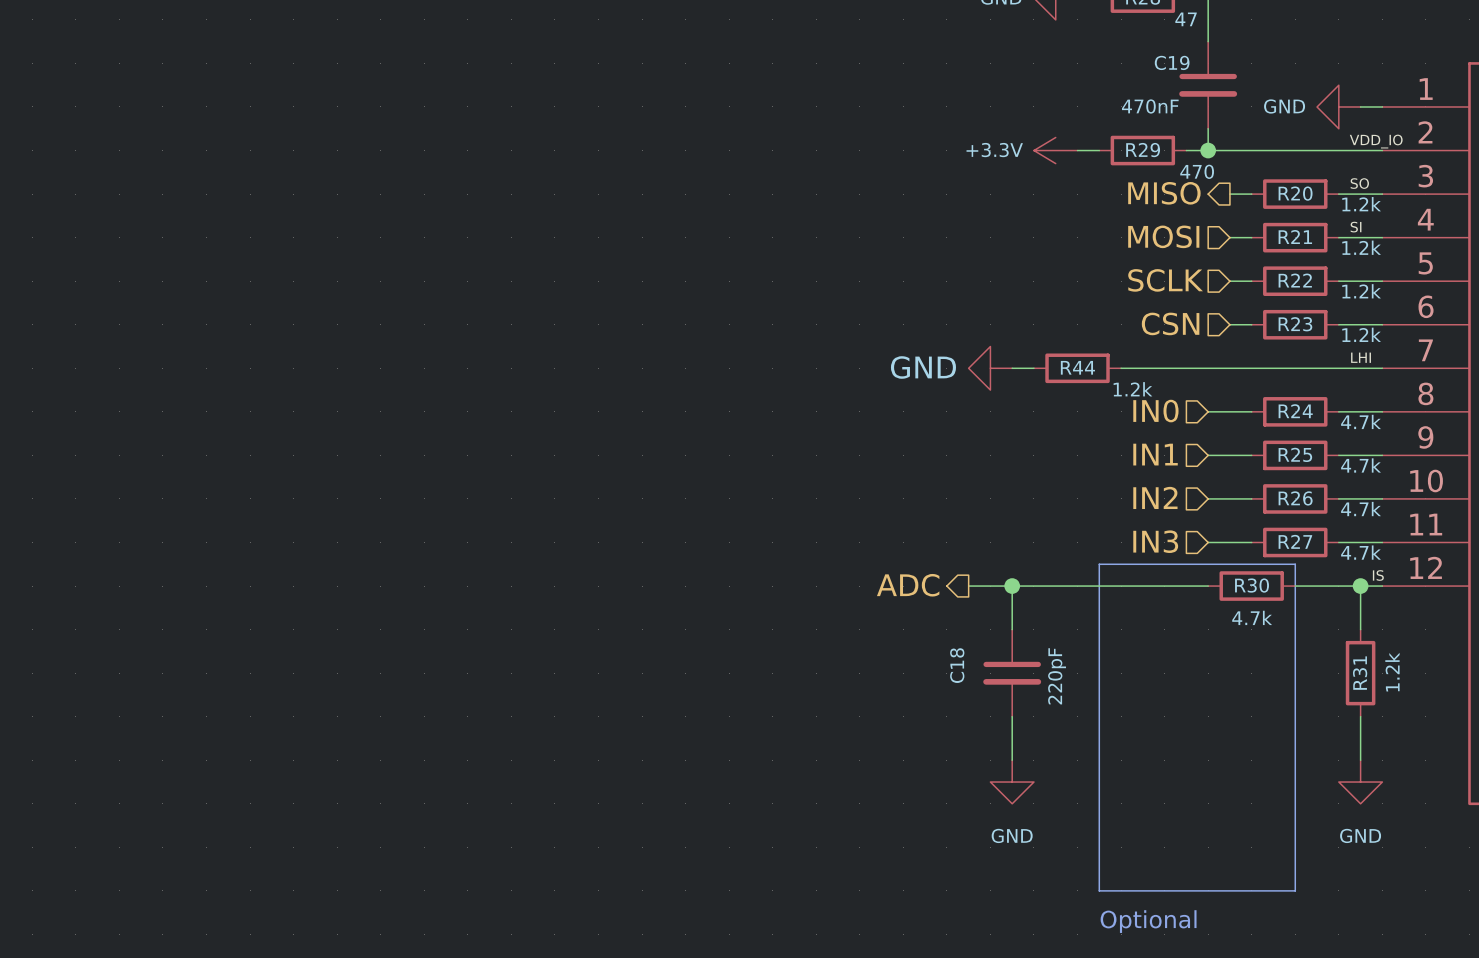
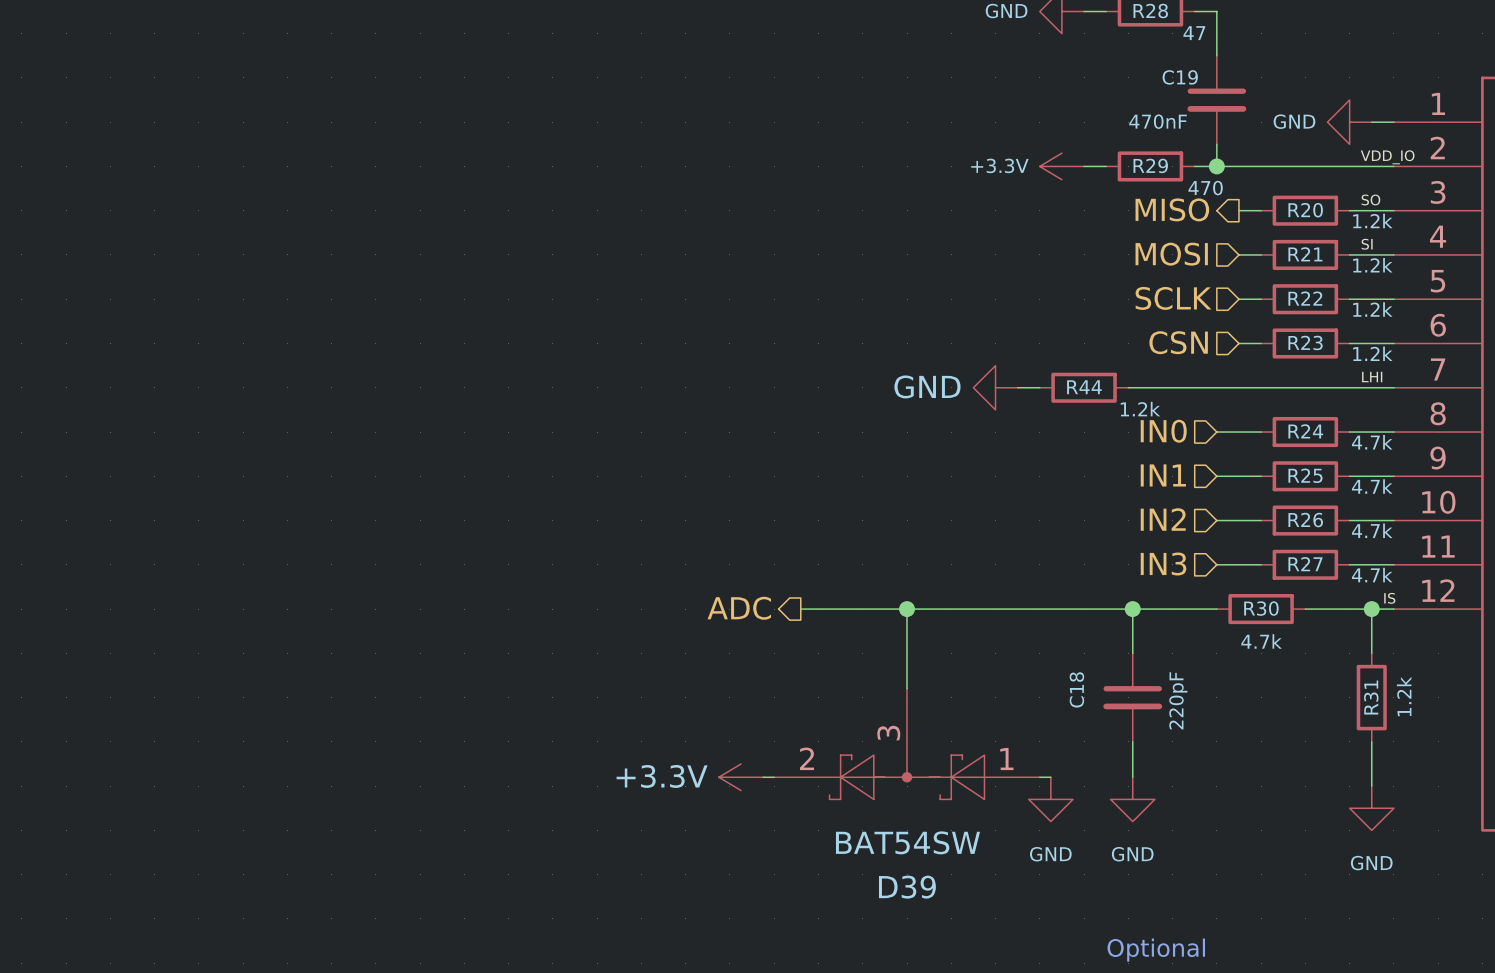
line: (1099, 564) (1099, 890) (1295, 890) (1295, 564) (1099, 564) -> none
hierarchical label position: ADC (908, 585) -> ADC (739, 608)
wire: none -> (800, 609) (973, 609)
wire: none -> (907, 609) (907, 688)
junction: none -> (907, 609)
wire: (1012, 586) (1012, 629) -> (1132, 609) (1132, 653)
junction: (1012, 586) -> none
junction: none -> (1132, 609)
C18 position: (1012, 673) -> (1132, 697)
wire: (1012, 716) (1012, 760) -> none
wire: none -> (1132, 741) (1132, 777)
D39: none -> BAT54SW (907, 744)
power symbol: none -> +3.3V (741, 777)
wire: none -> (763, 777) (774, 777)
wire: none -> (1039, 777) (1050, 777)
power symbol: none -> GND (1132, 799)
power symbol position: GND (1012, 782) -> GND (1050, 799)

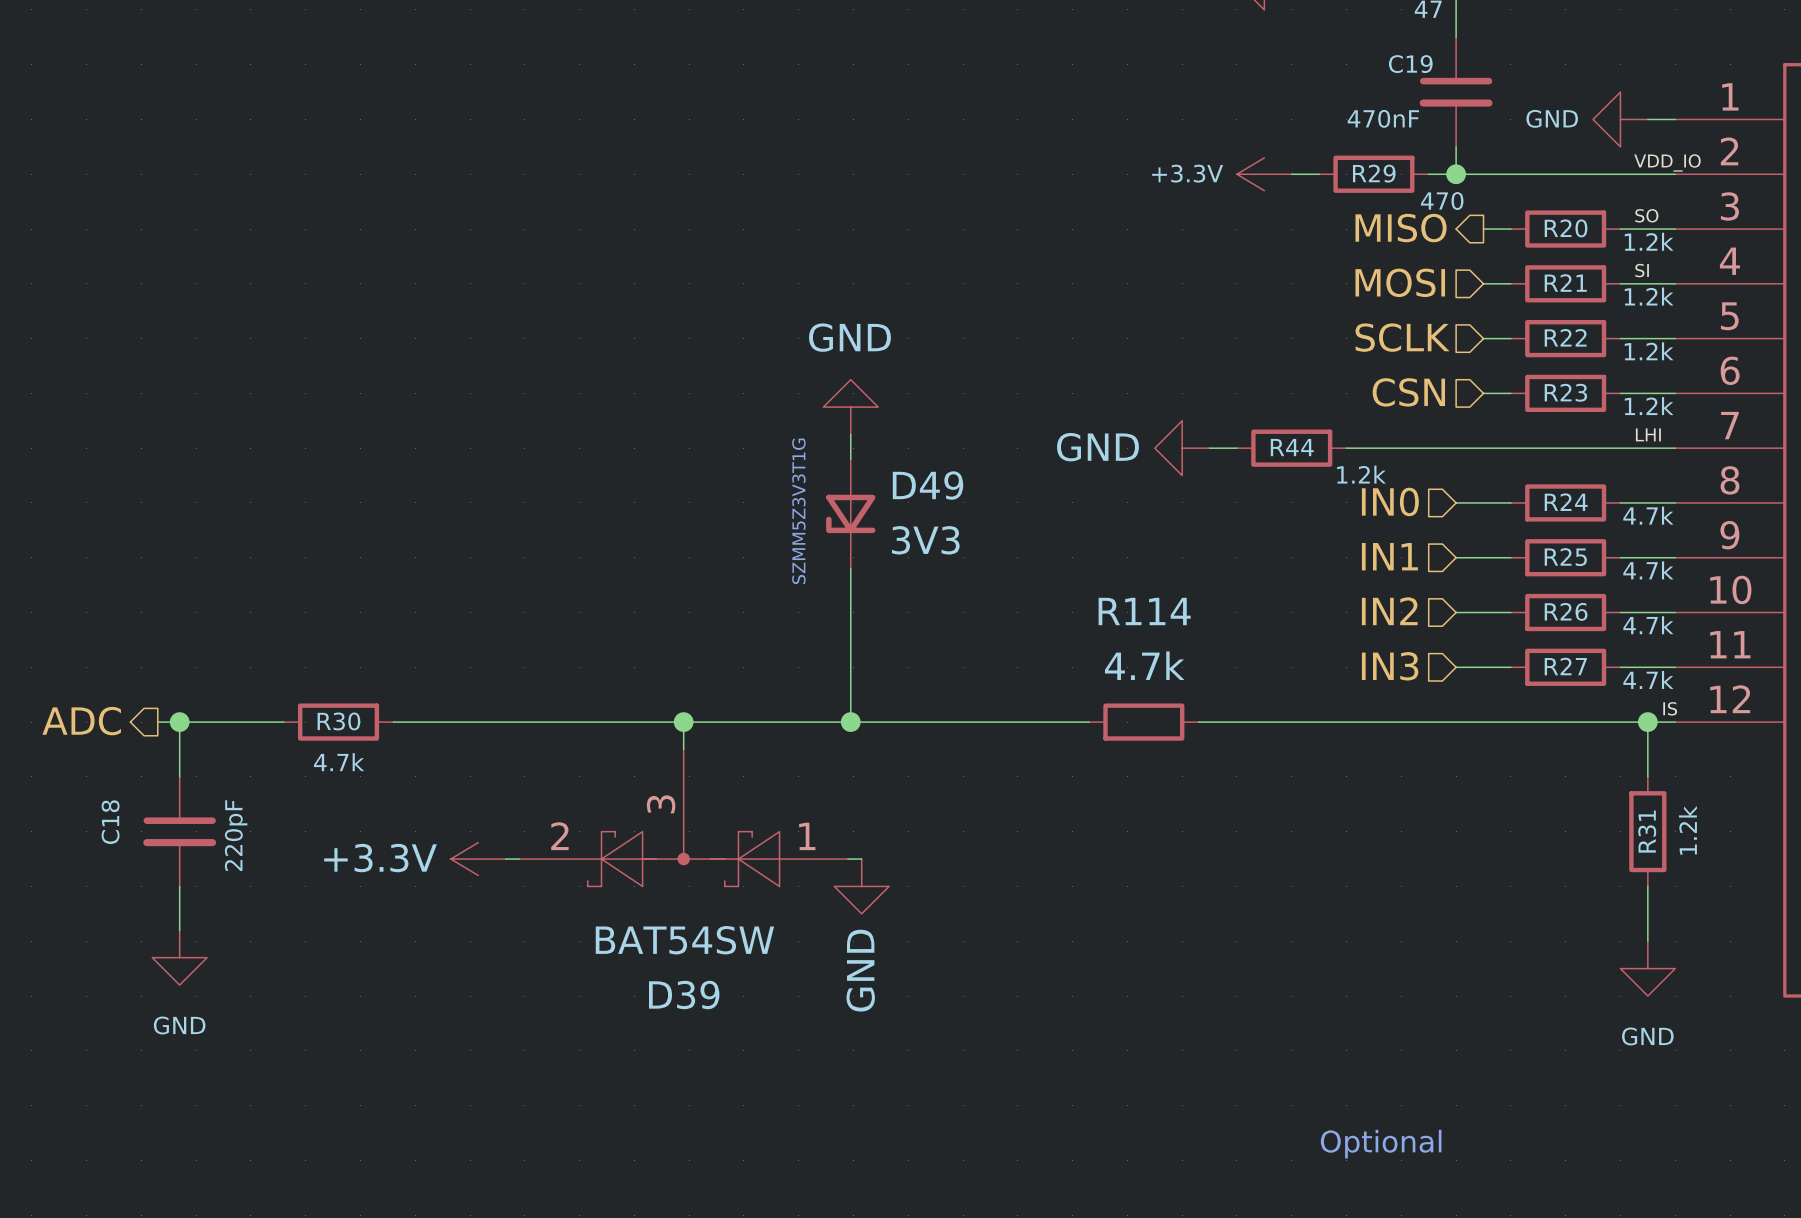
power symbol: none -> GND (850, 407)
wire: none -> (850, 434) (850, 459)
text: none -> SZMM5Z3V3T1G (798, 511)
D49: none -> 3V3 (850, 513)
wire: none -> (850, 568) (850, 722)
hierarchical label: none -> ADC (81, 721)
hierarchical label: ADC (739, 608) -> none
wire: none -> (157, 722) (283, 722)
wire: none -> (179, 722) (179, 776)
junction: none -> (179, 722)
wire: none -> (393, 722) (941, 722)
wire: none -> (683, 722) (683, 749)
junction: none -> (683, 722)
junction: none -> (850, 722)
wire: (907, 609) (907, 688) -> none
junction: (907, 609) -> none
wire: (920, 609) (1008, 609) -> (1456, 722) (1565, 722)
R114: none -> 4.7k (1143, 722)
wire: (1132, 609) (1132, 653) -> none
junction: (1132, 609) -> none
R30 position: (1261, 609) -> (338, 722)
C18 position: (1132, 697) -> (179, 831)
wire: none -> (179, 886) (179, 930)
power symbol: none -> GND (861, 886)
wire: (1132, 741) (1132, 777) -> none
D39 position: (907, 744) -> (683, 817)
power symbol position: +3.3V (741, 777) -> +3.3V (478, 859)
wire: (763, 777) (774, 777) -> (505, 859) (519, 859)
wire: (1039, 777) (1050, 777) -> (848, 859) (861, 859)
power symbol: none -> GND (179, 957)
power symbol: GND (1050, 799) -> none
power symbol: GND (1132, 799) -> none

